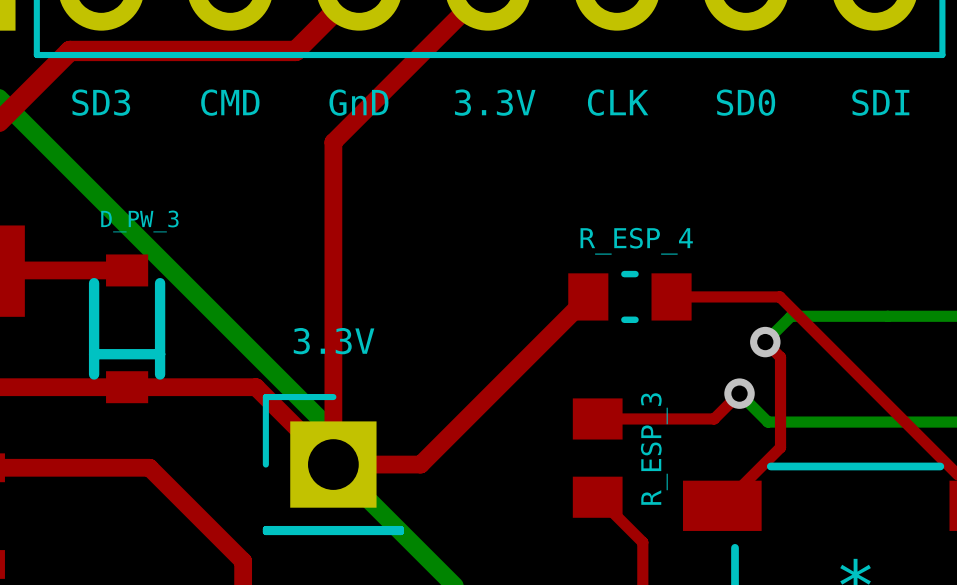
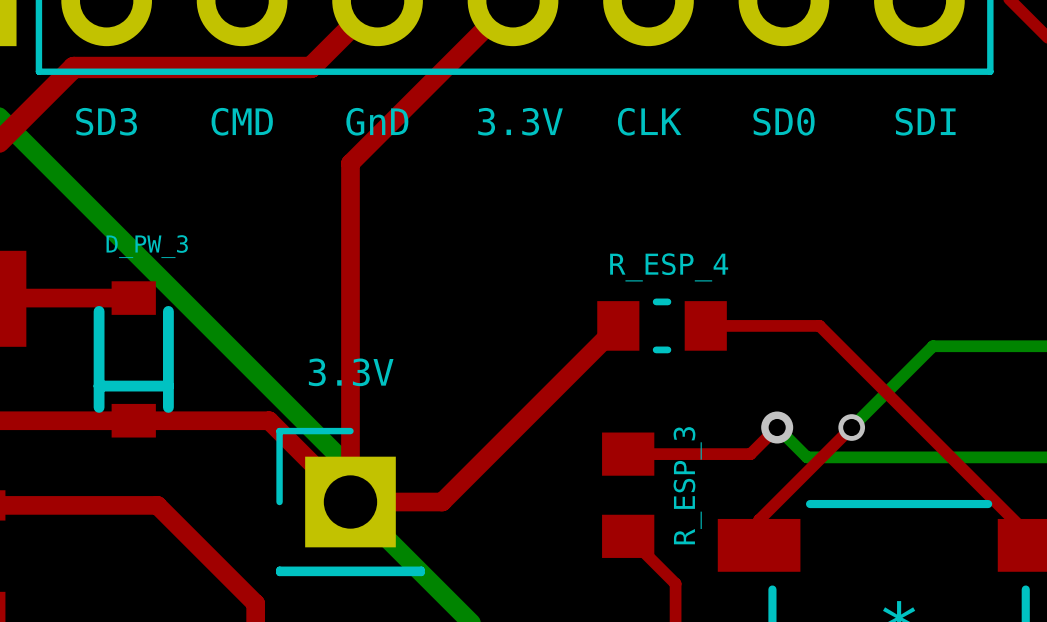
bottom track: (887, 316) (791, 316) (765, 342) -> (932, 346) (851, 427)
top track: (765, 342) (780, 357) (780, 447) (722, 505) -> (851, 427) (759, 520) (759, 545)
via: (765, 342) -> none
via: none -> (851, 427)

